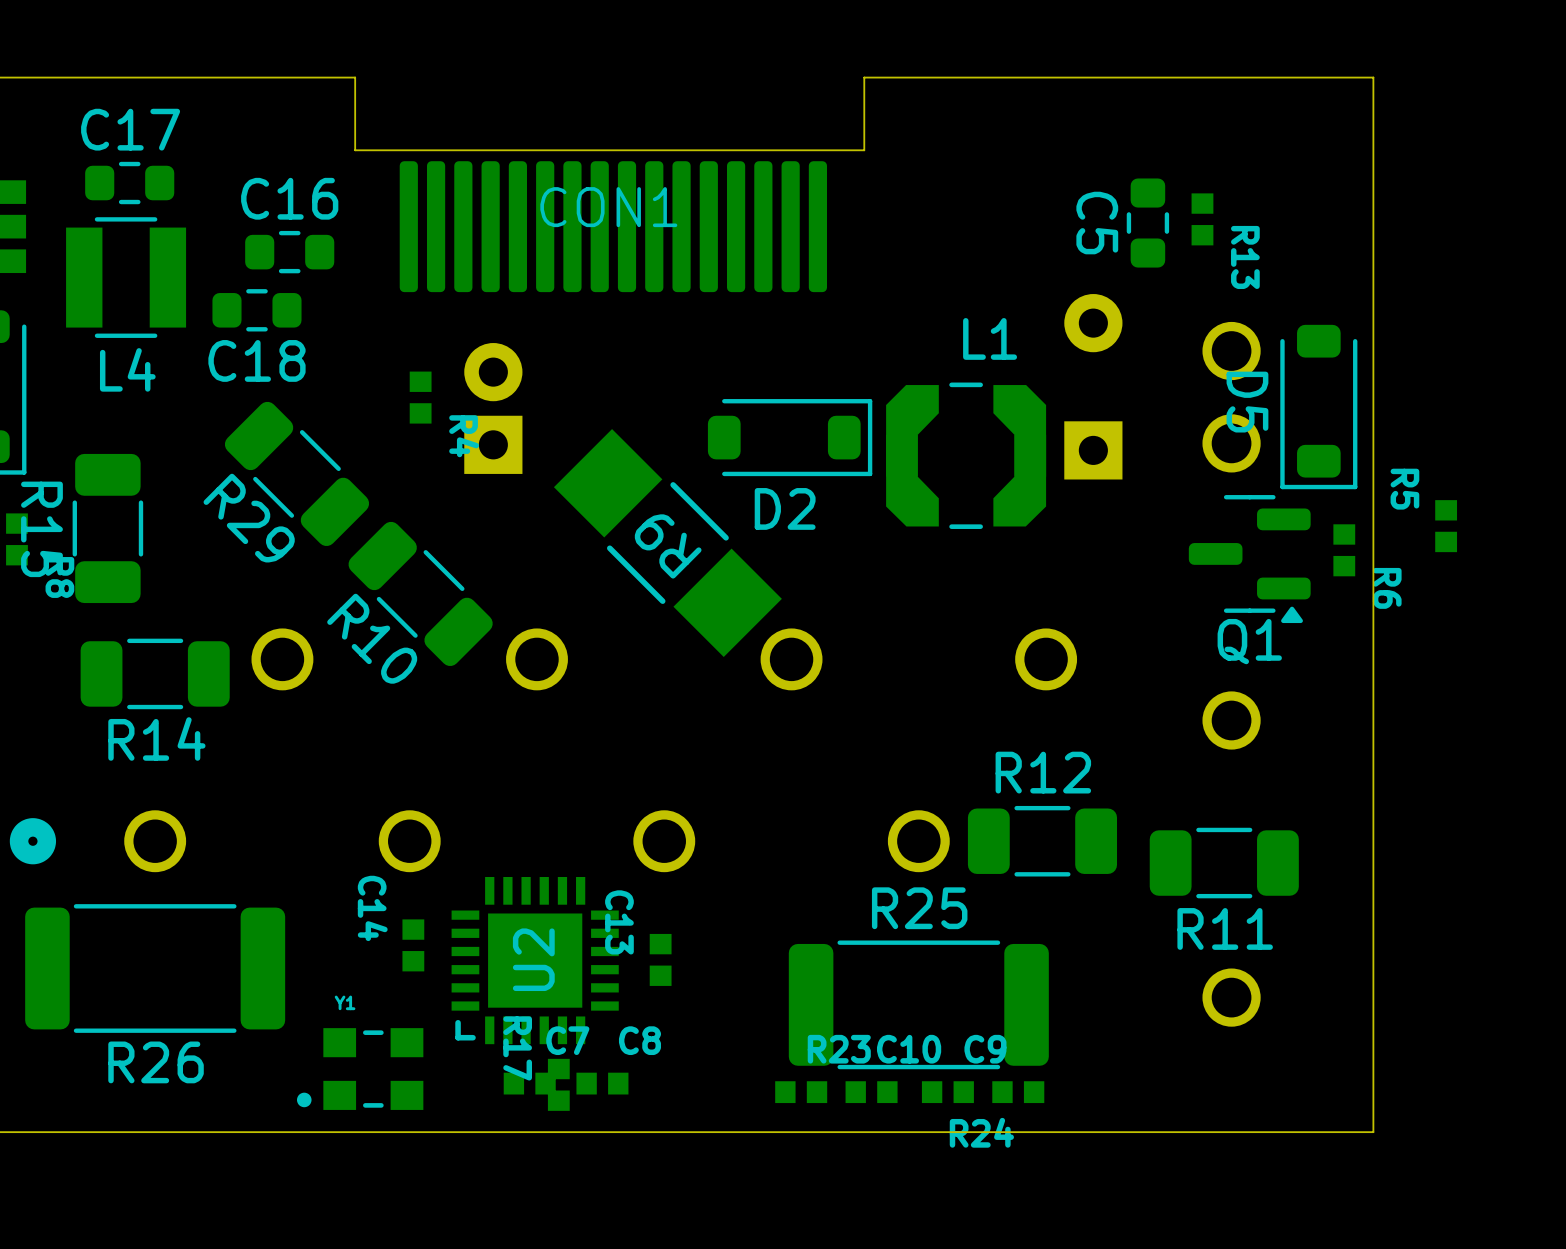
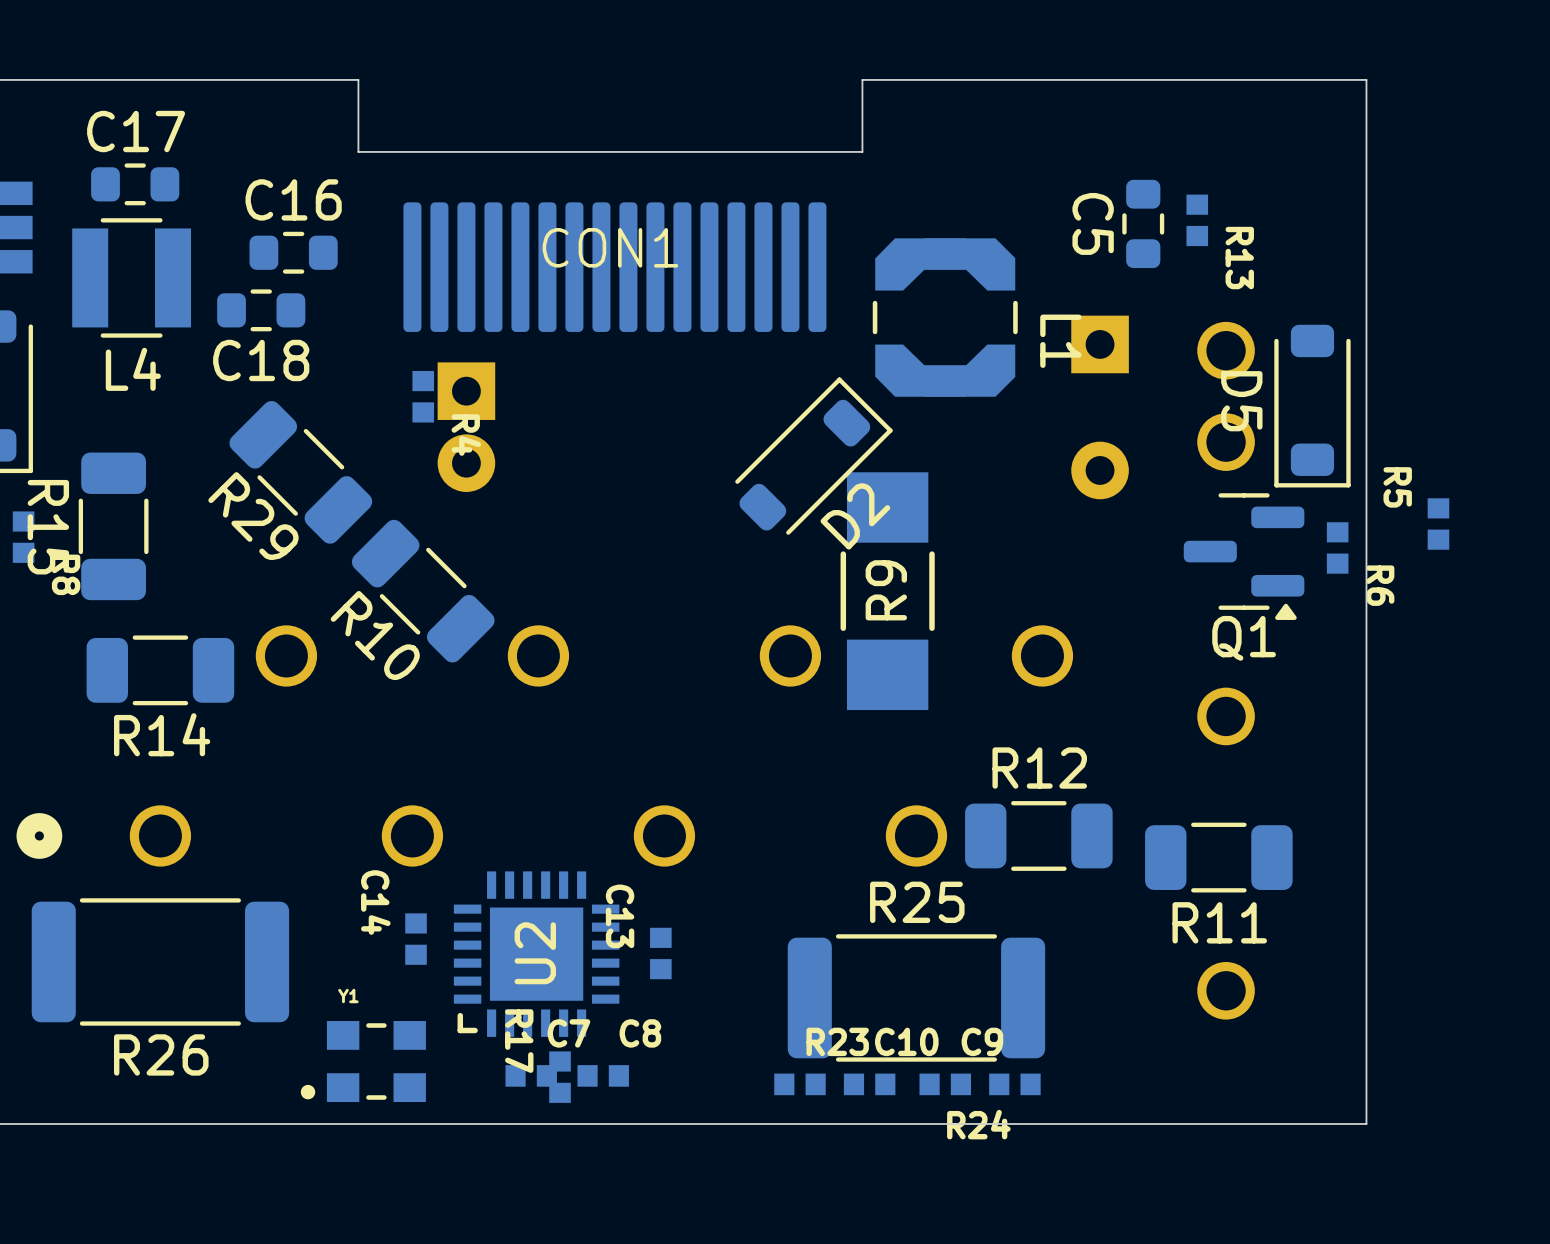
CON1 position: (613, 226) -> (614, 267)
part rotation: 0° (1093, 386) -> 180° (1100, 407)
part rotation: 0° (493, 408) -> 180° (466, 427)
D2 rotation: 0° (790, 437) -> 45° counterclockwise (813, 456)
L1 rotation: 0° (966, 455) -> 90° clockwise (945, 317)
L1 position: (966, 455) -> (945, 317)
R9 rotation: 0° (667, 543) -> 45° clockwise (887, 591)
R9 position: (667, 543) -> (887, 591)

